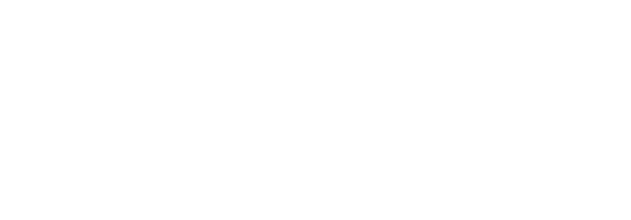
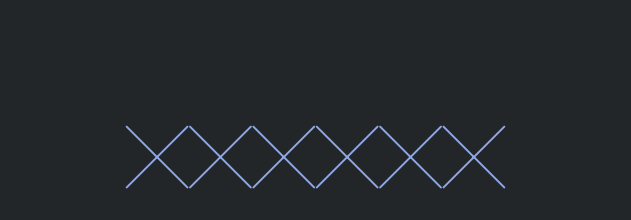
no-connect mark: none -> (157, 157)
no-connect mark: none -> (220, 157)
no-connect mark: none -> (283, 157)
no-connect mark: none -> (347, 157)
no-connect mark: none -> (410, 157)
no-connect mark: none -> (473, 157)

